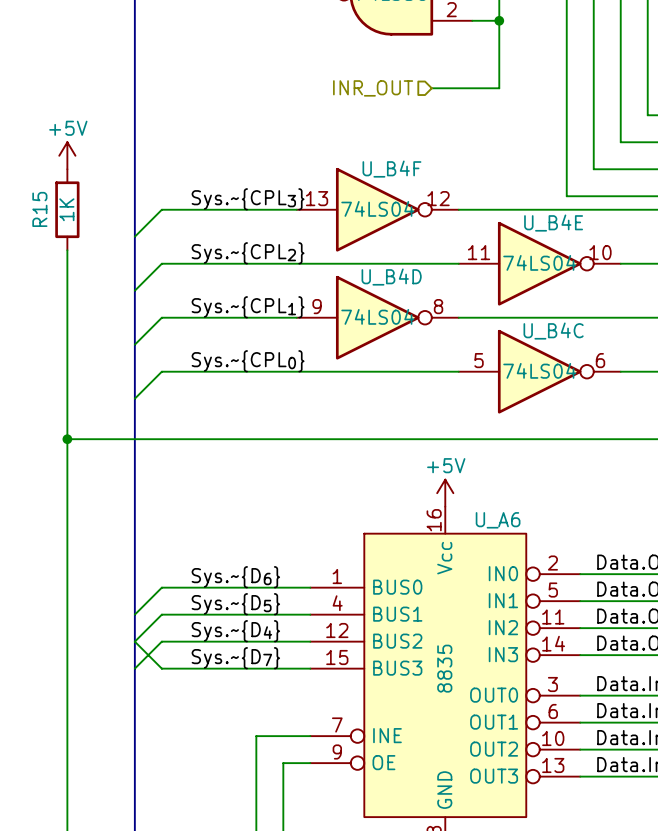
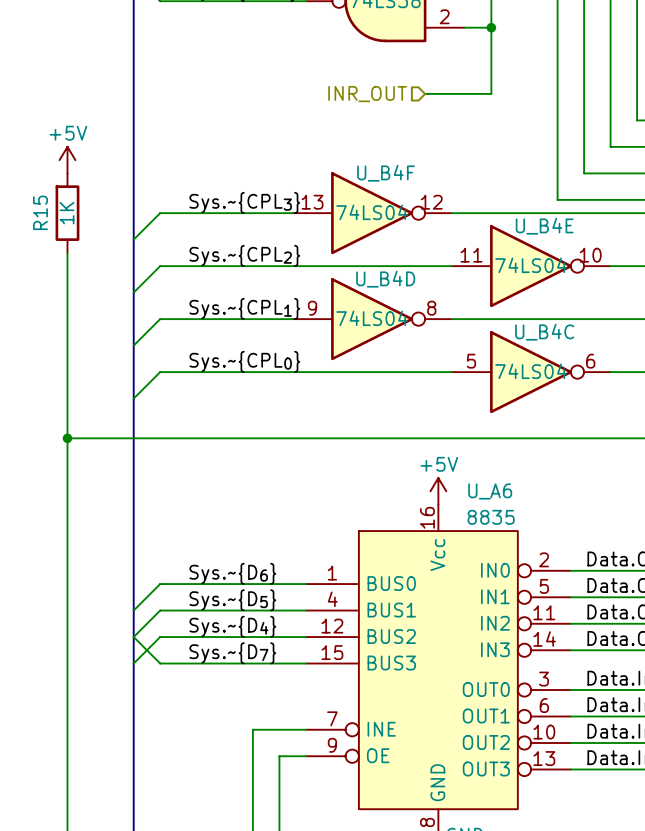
U_A6 name position: U_A6 (498, 520) -> U_A6 (490, 491)
U_A6 value rotation: 0° (444, 668) -> 90° clockwise (491, 517)
U_A6 value position: 8835 (444, 668) -> 8835 (491, 517)

